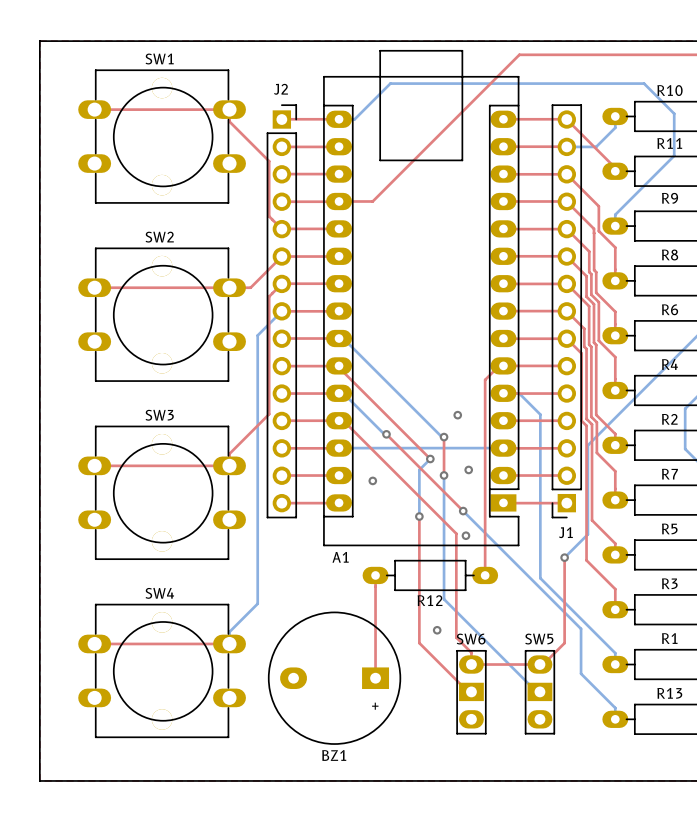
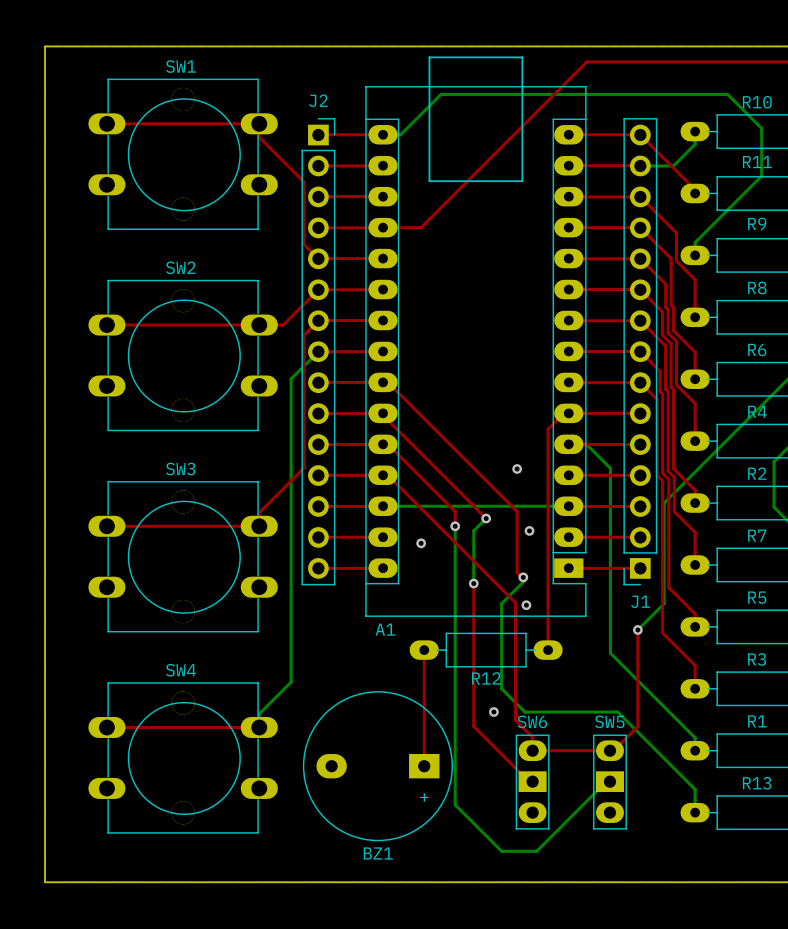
top track: none -> (383, 382) (387, 382) (517, 511) (517, 572) (524, 580)
bottom track: (339, 338) (343, 338) (444, 437) -> none
top track: none -> (383, 444) (387, 444) (455, 511) (455, 526)
bottom track: (339, 393) (343, 393) (386, 434) -> none
top track: (386, 434) (463, 511) -> none
via: (386, 434) -> none
top track: (444, 437) (444, 475) -> none
via: (444, 437) -> none
bottom track: none -> (455, 526) (455, 804) (501, 851) (536, 851) (606, 781)
via: none -> (455, 526)
bottom track: (444, 475) (444, 534) -> (524, 580) (501, 603)
via: (444, 475) -> none
bottom track: (463, 511) (581, 628) (581, 673) (615, 707) -> none
bottom track: (444, 599) (536, 691) -> (501, 676) (501, 688) (524, 712) (617, 712) (695, 789) (695, 799)

